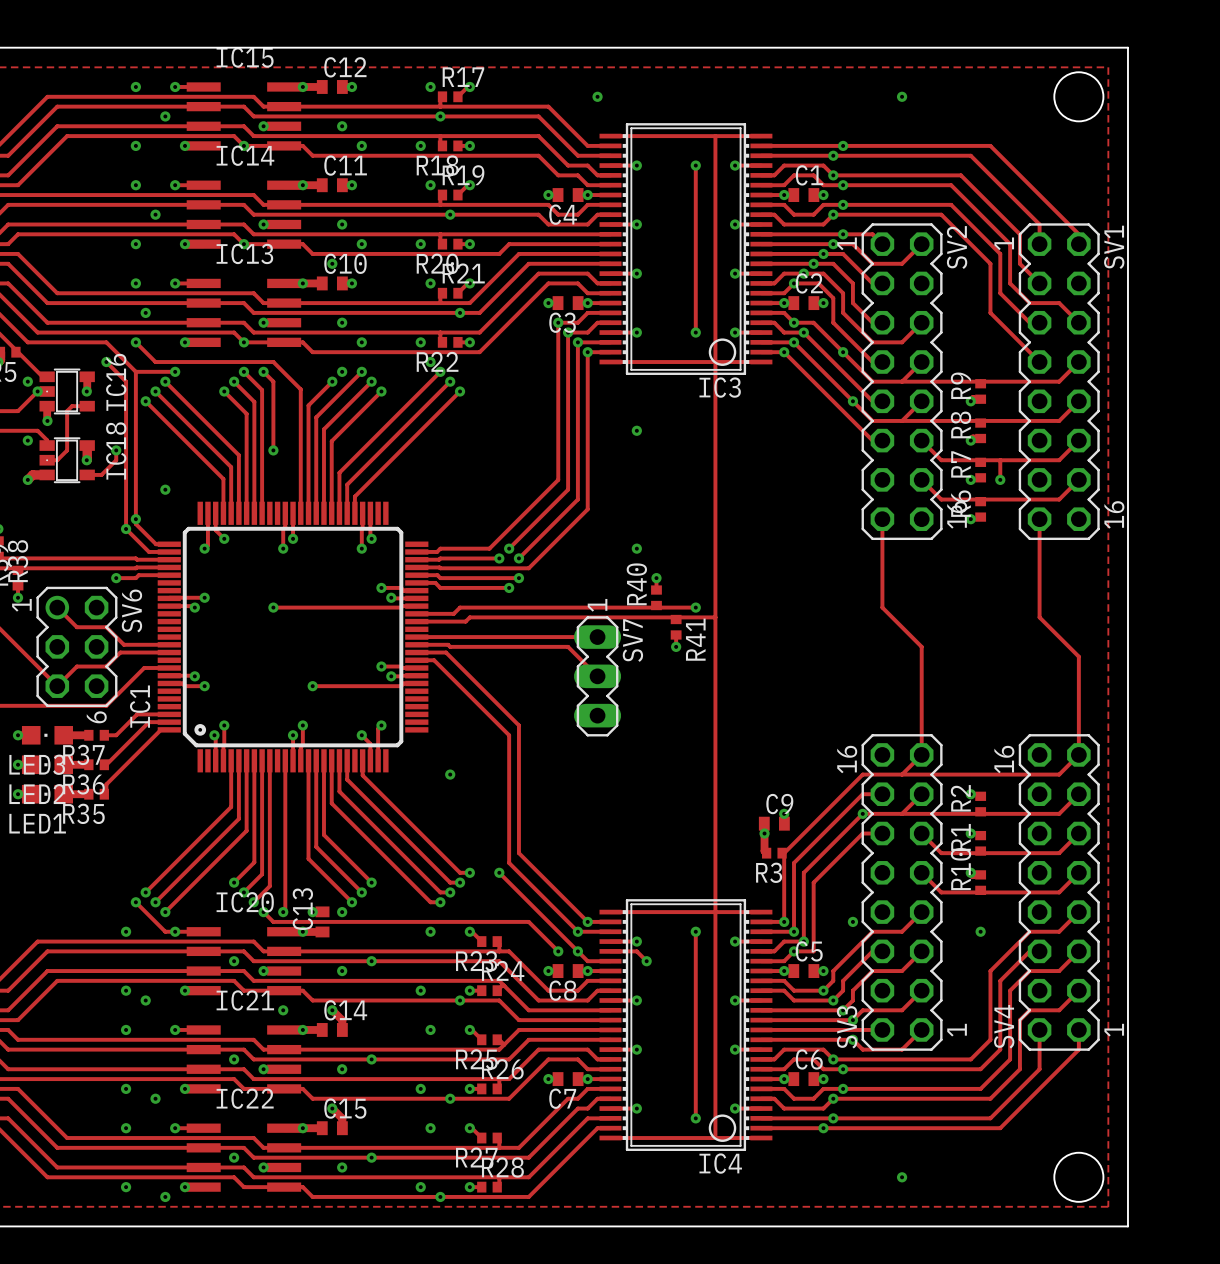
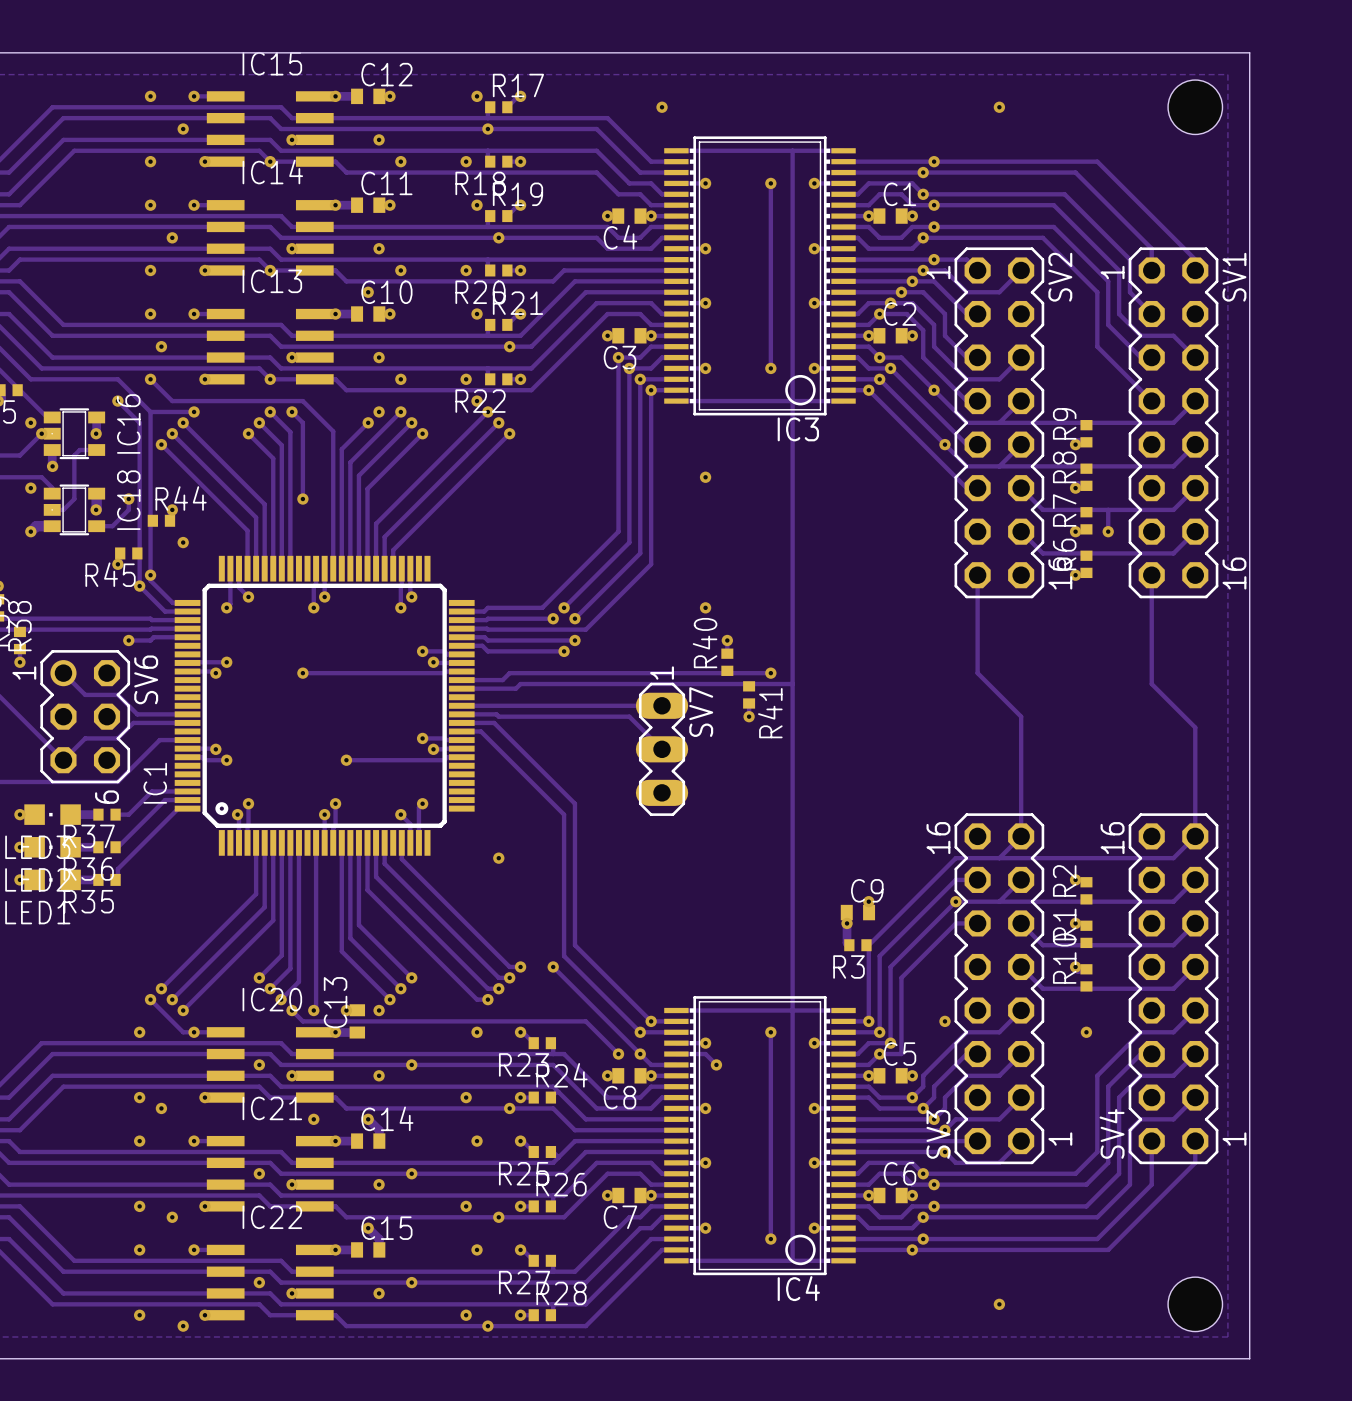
via: none -> (172, 509)
R44: none -> (161, 520)
R45: none -> (128, 553)
via: none -> (117, 564)

